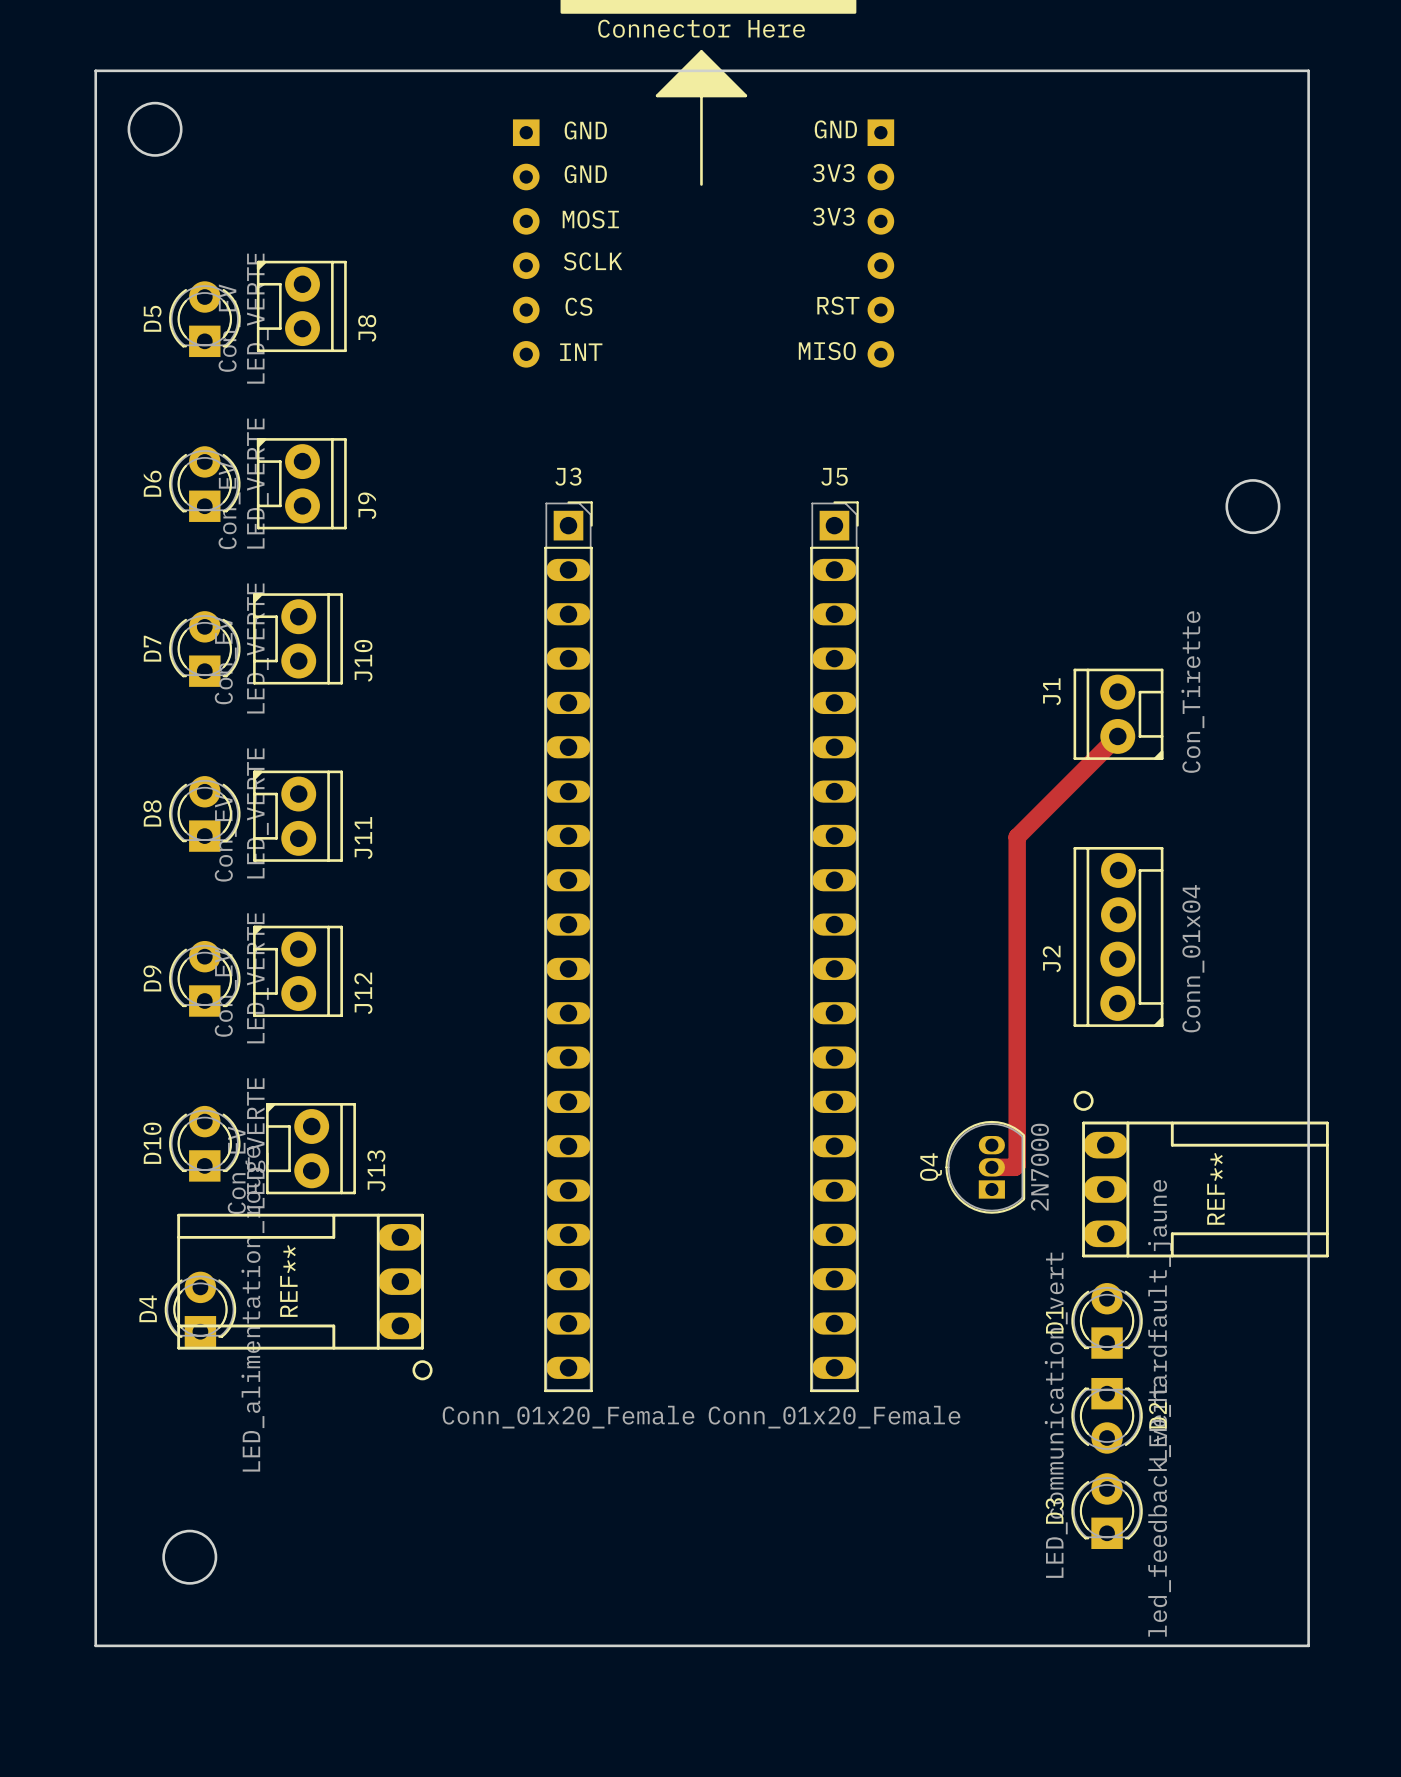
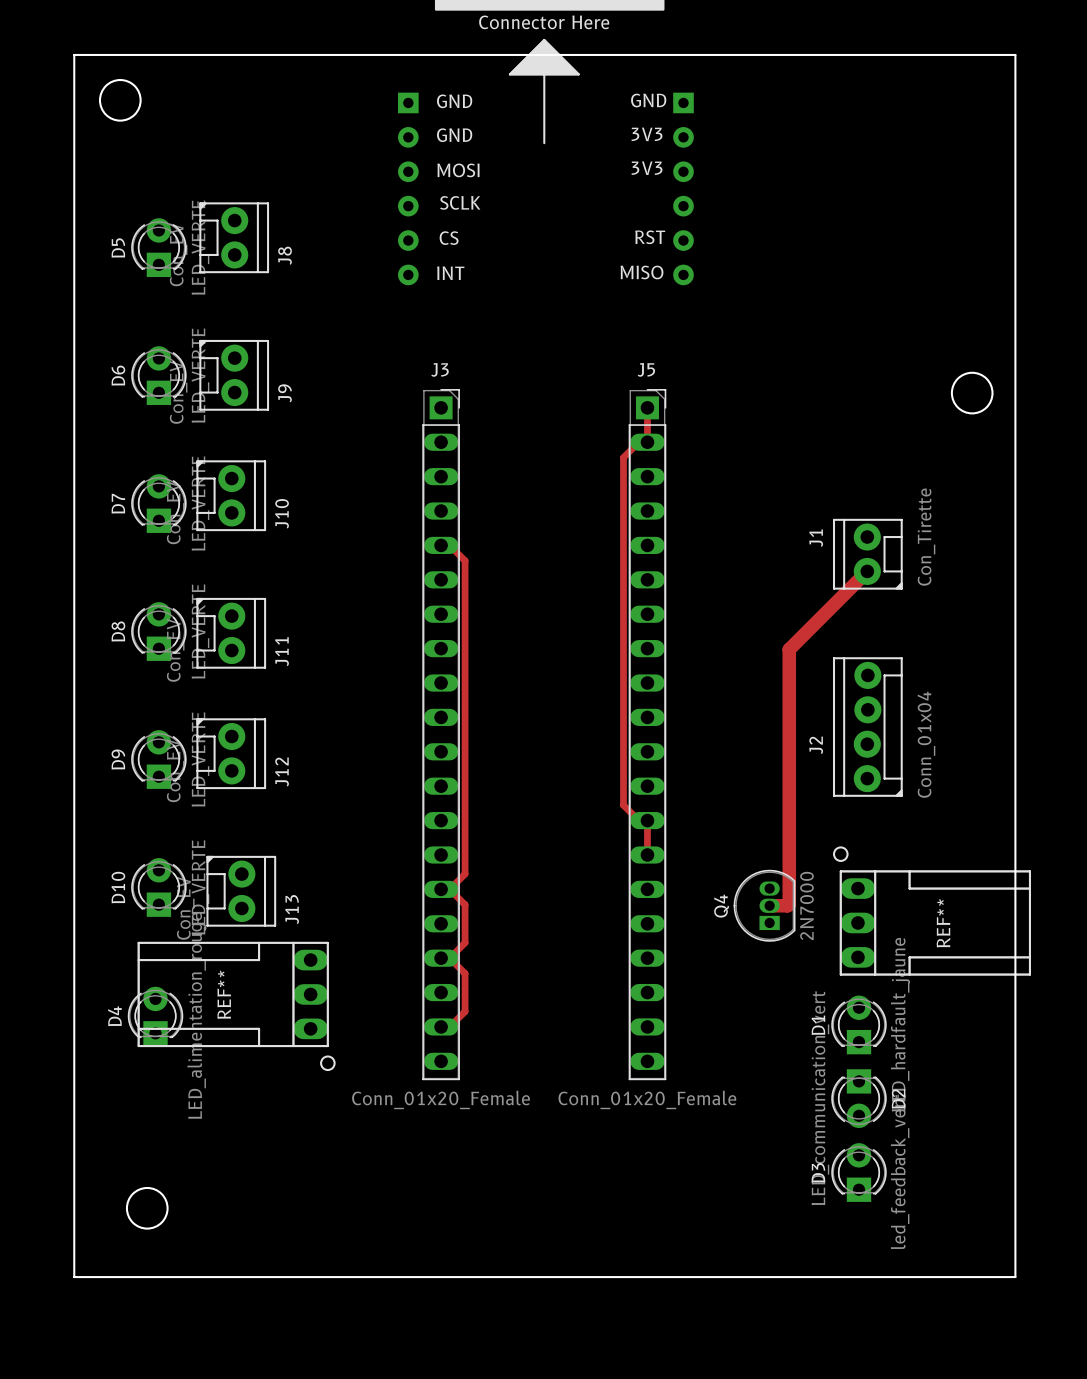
track: none -> (647, 407) (647, 442) (638, 442) (623, 457) (623, 805) (638, 820) (647, 820) (647, 854)
track: none -> (441, 545) (449, 545) (465, 560) (465, 874) (449, 889)
track: none -> (449, 889) (465, 904) (465, 942) (449, 958)
track: none -> (449, 958) (465, 973) (465, 1011) (449, 1026) (441, 1026)

